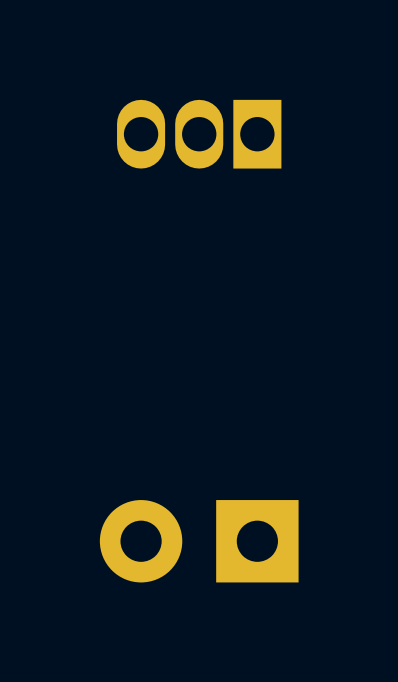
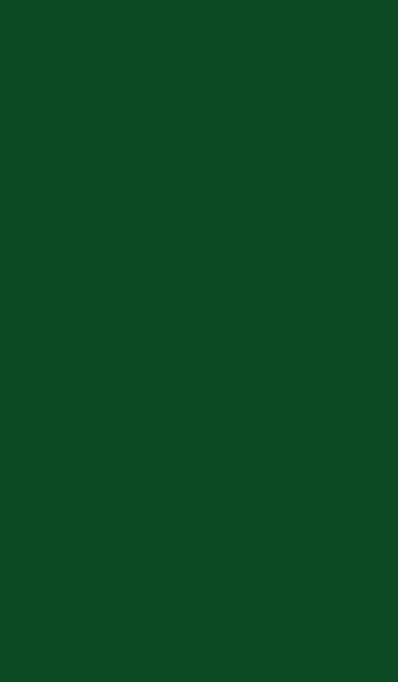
part: (199, 134) -> none
part: (199, 541) -> none

